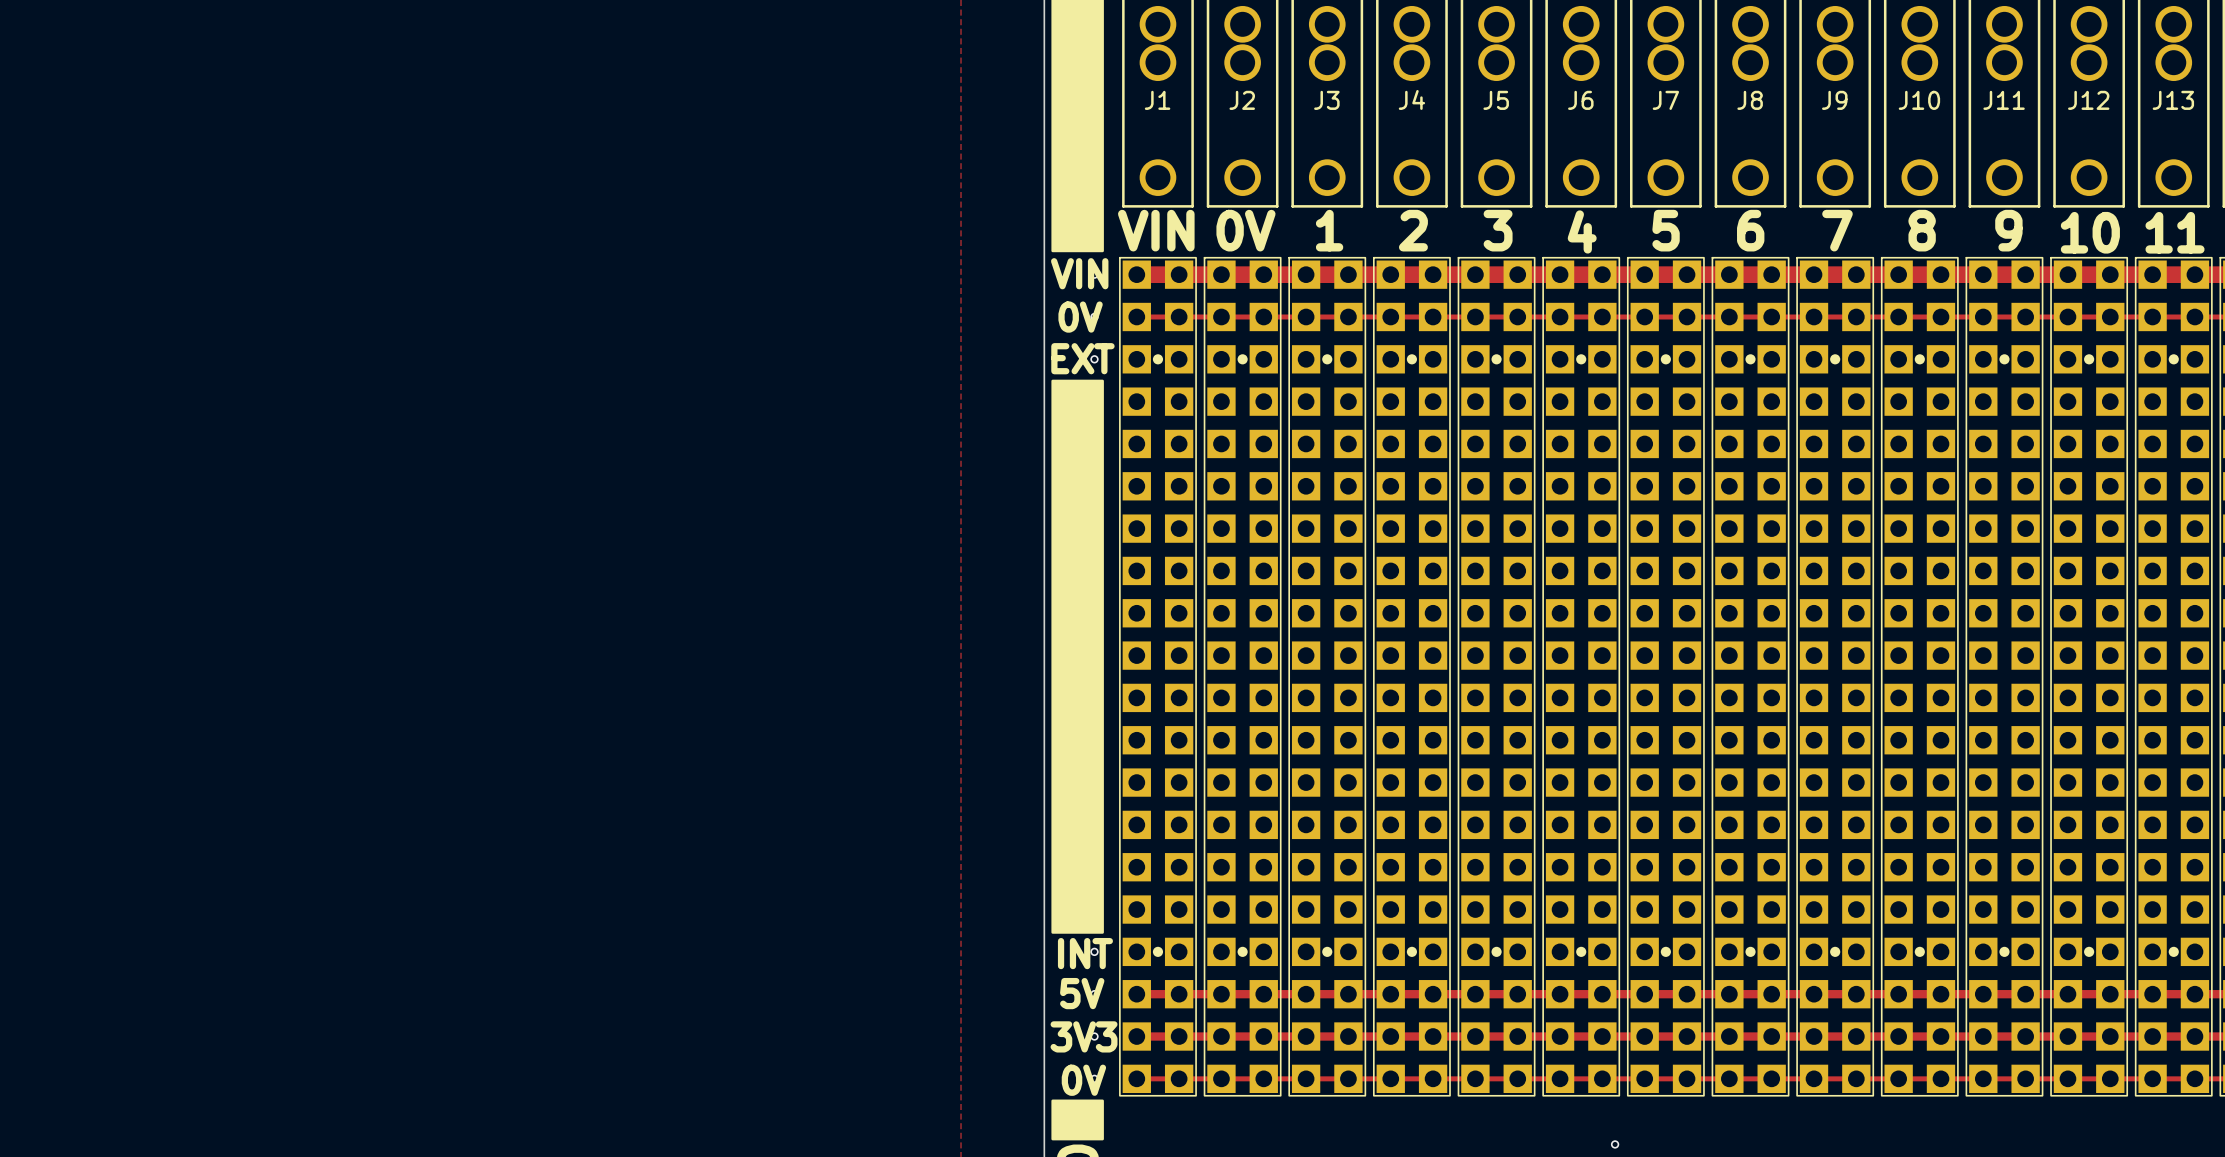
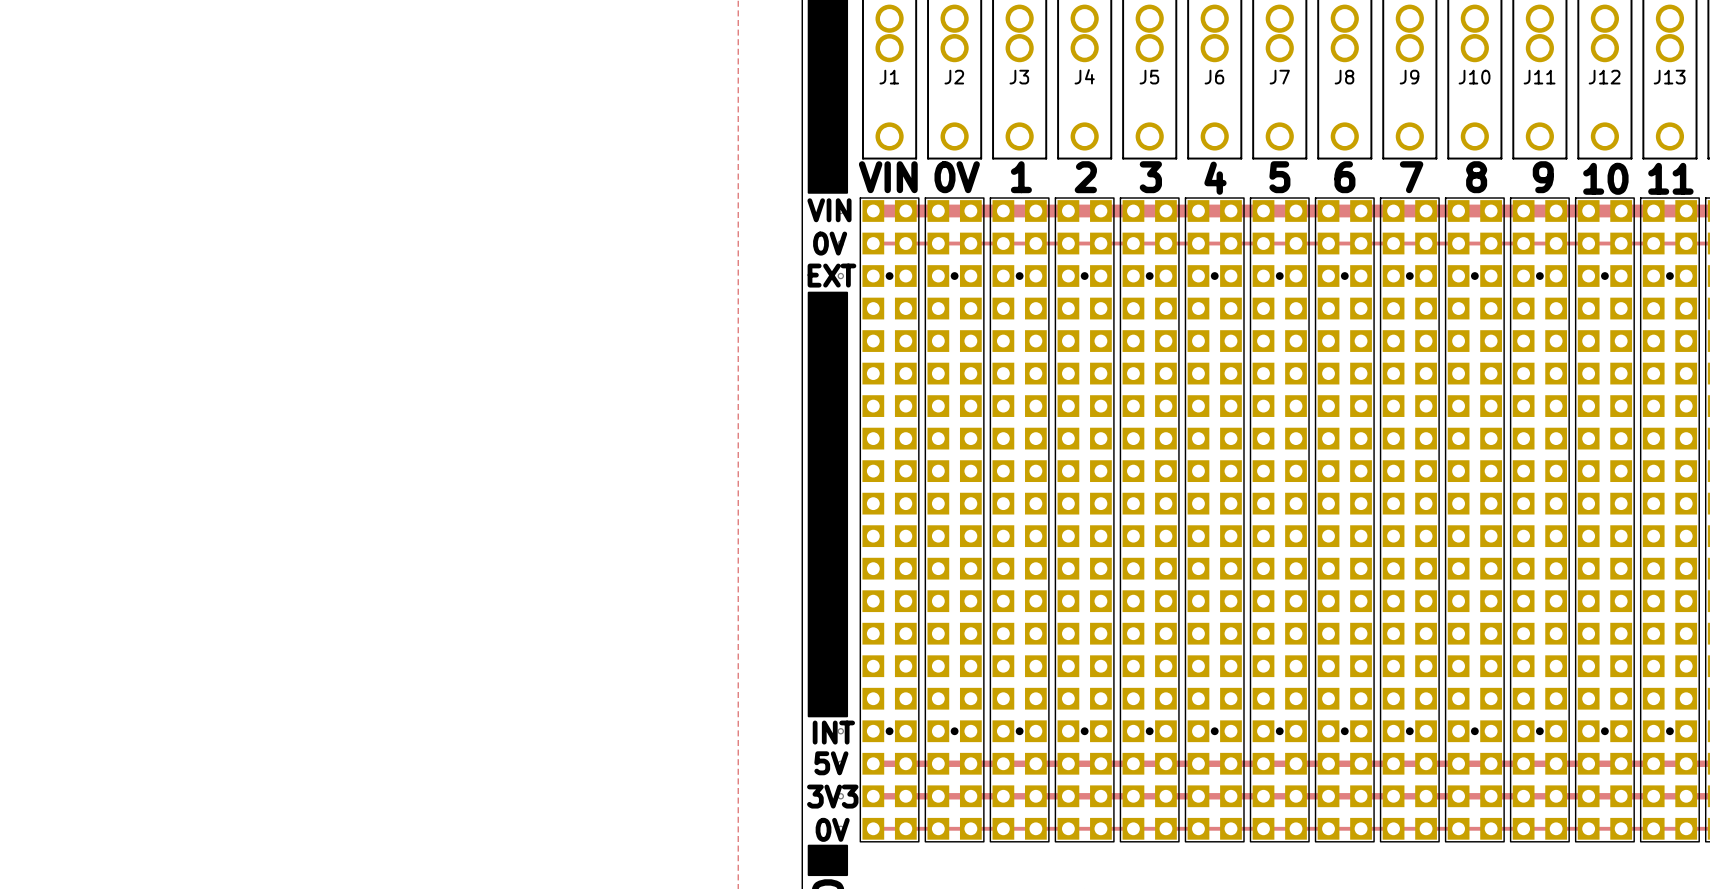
via: (1615, 1144) -> none

